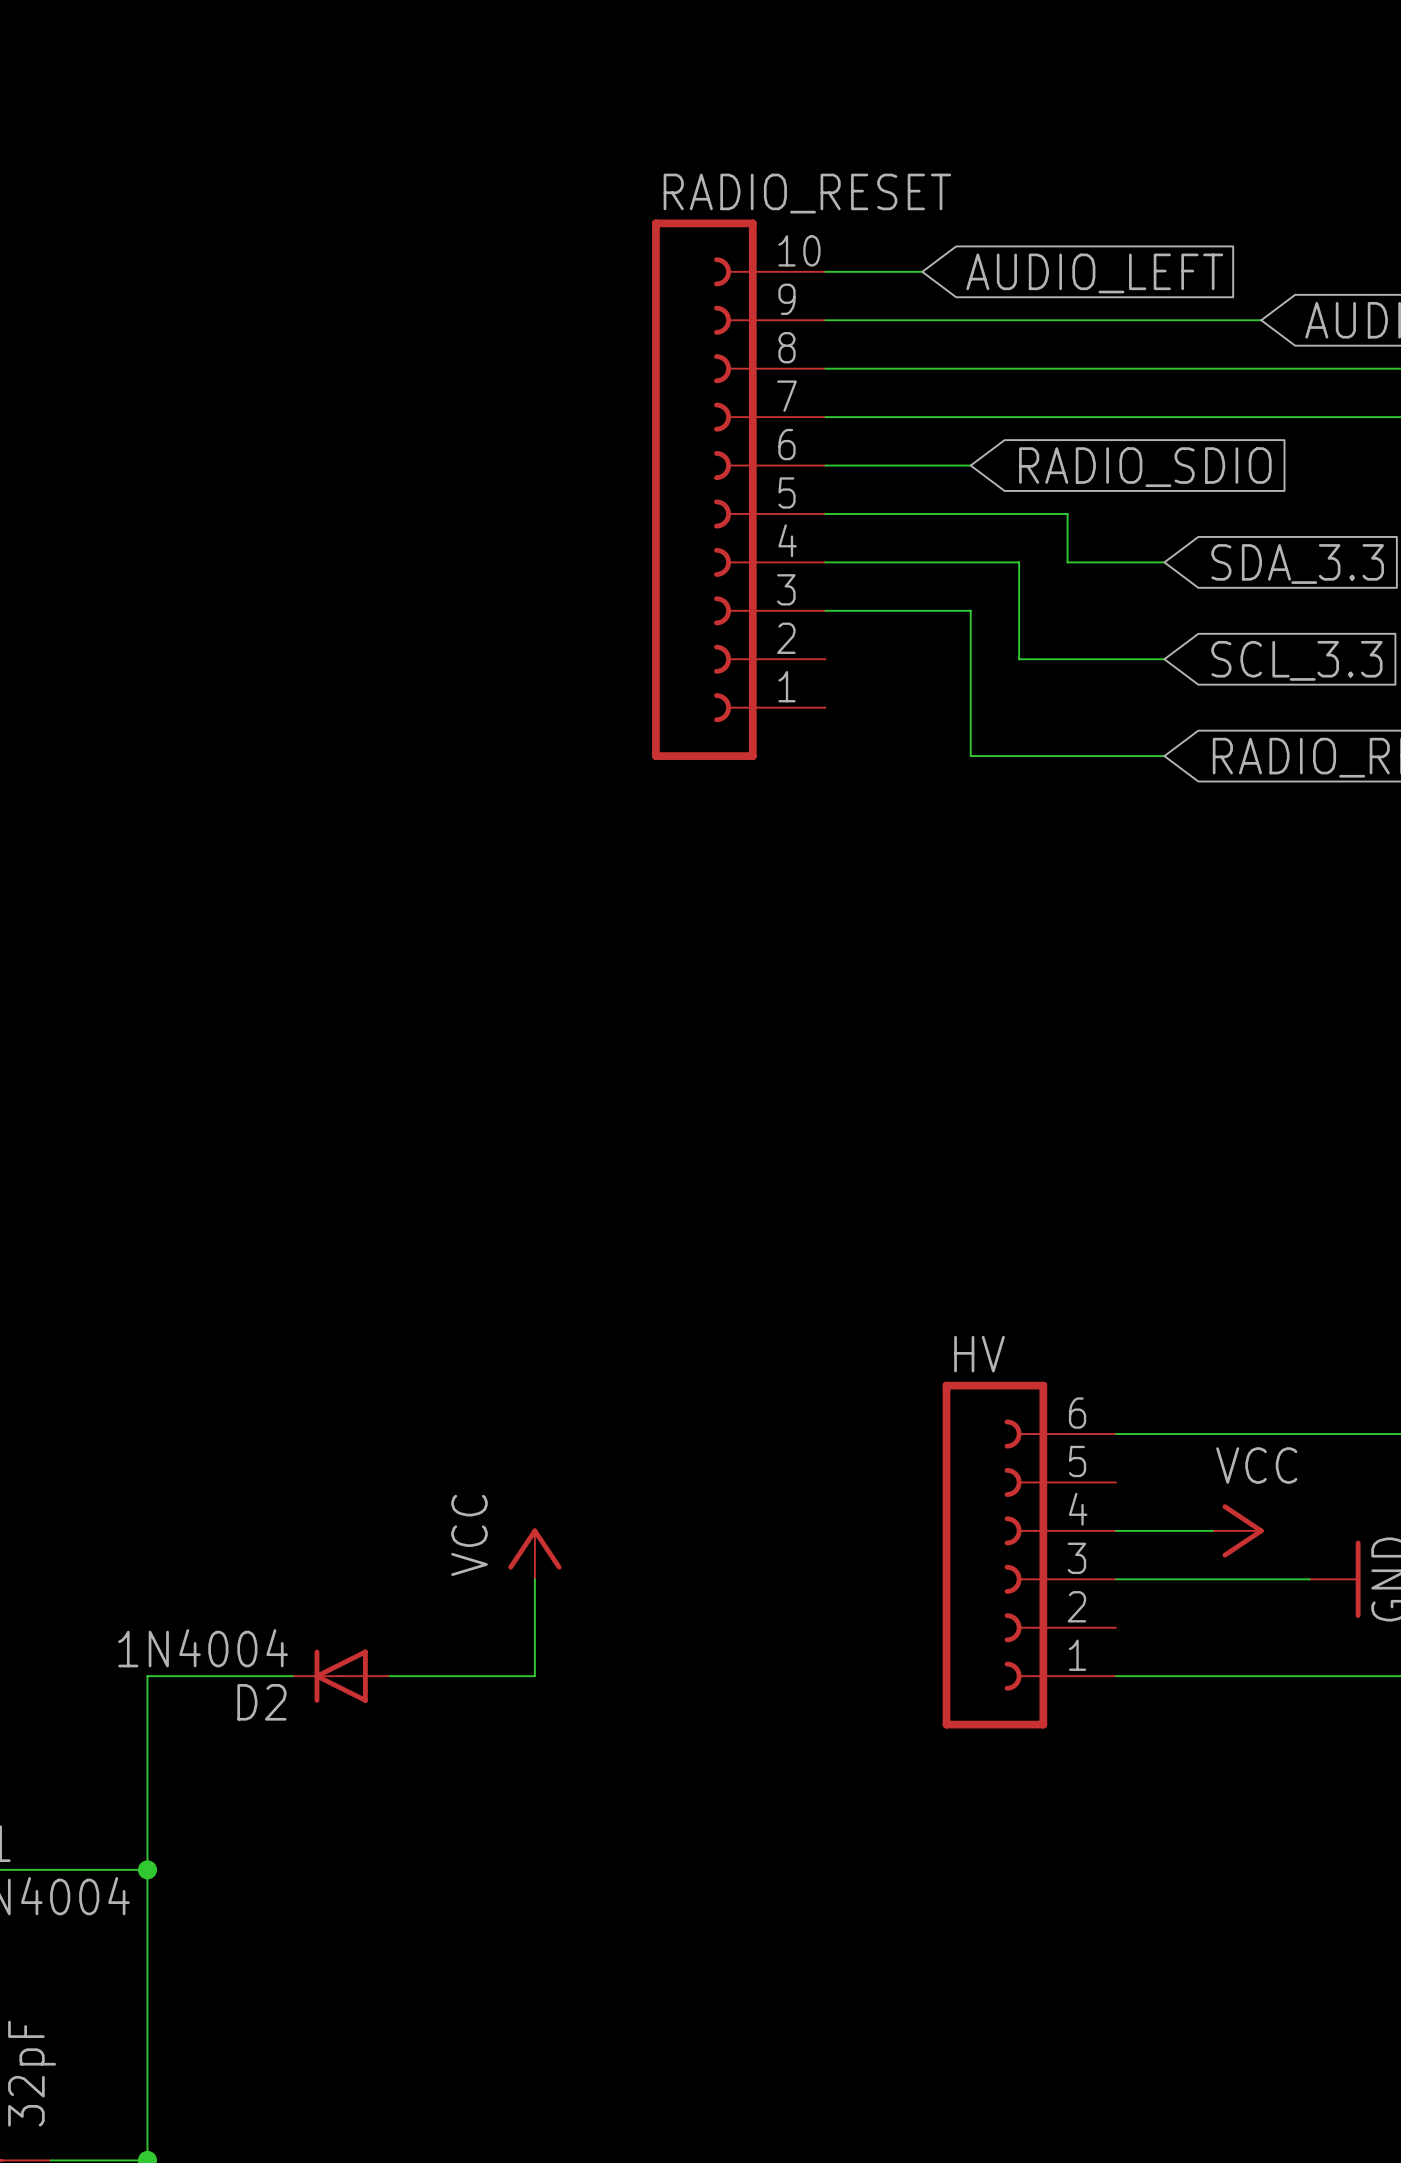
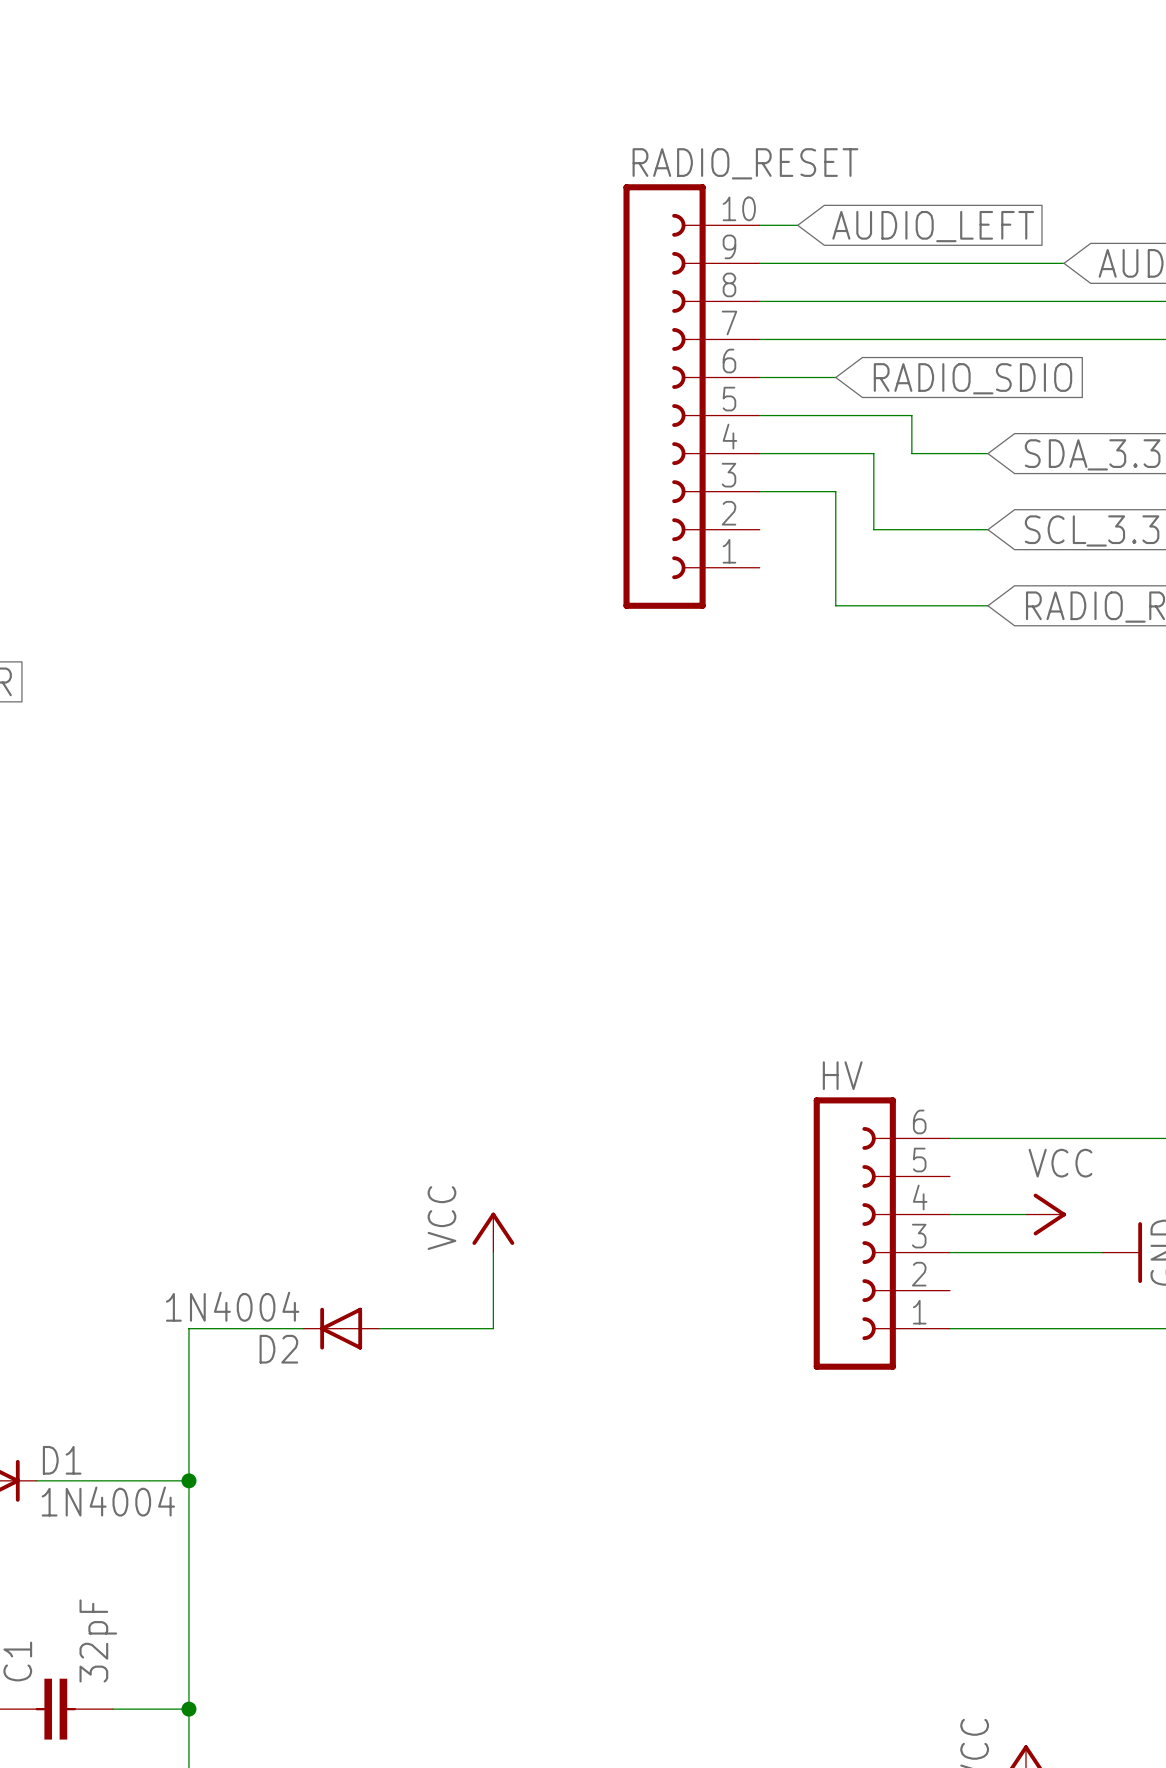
RADIO_RESET position: (738, 489) -> (691, 396)

